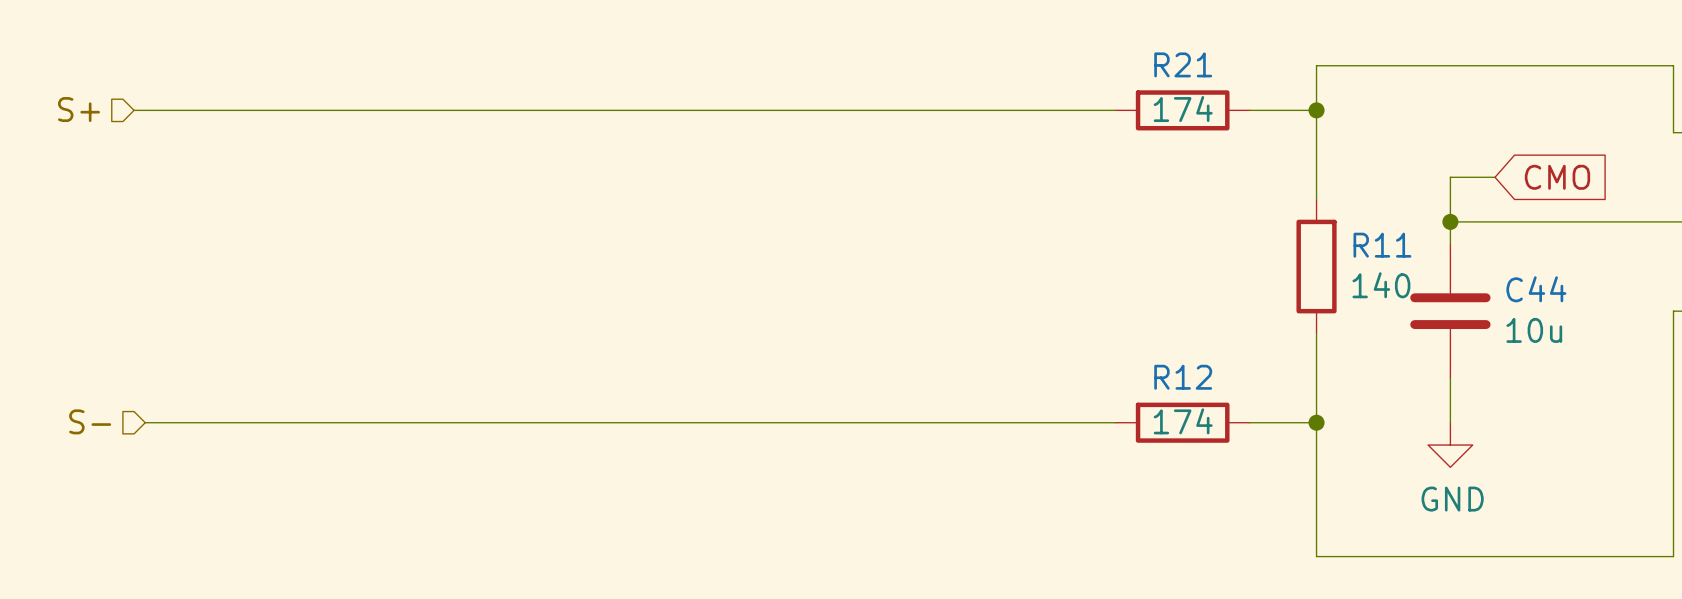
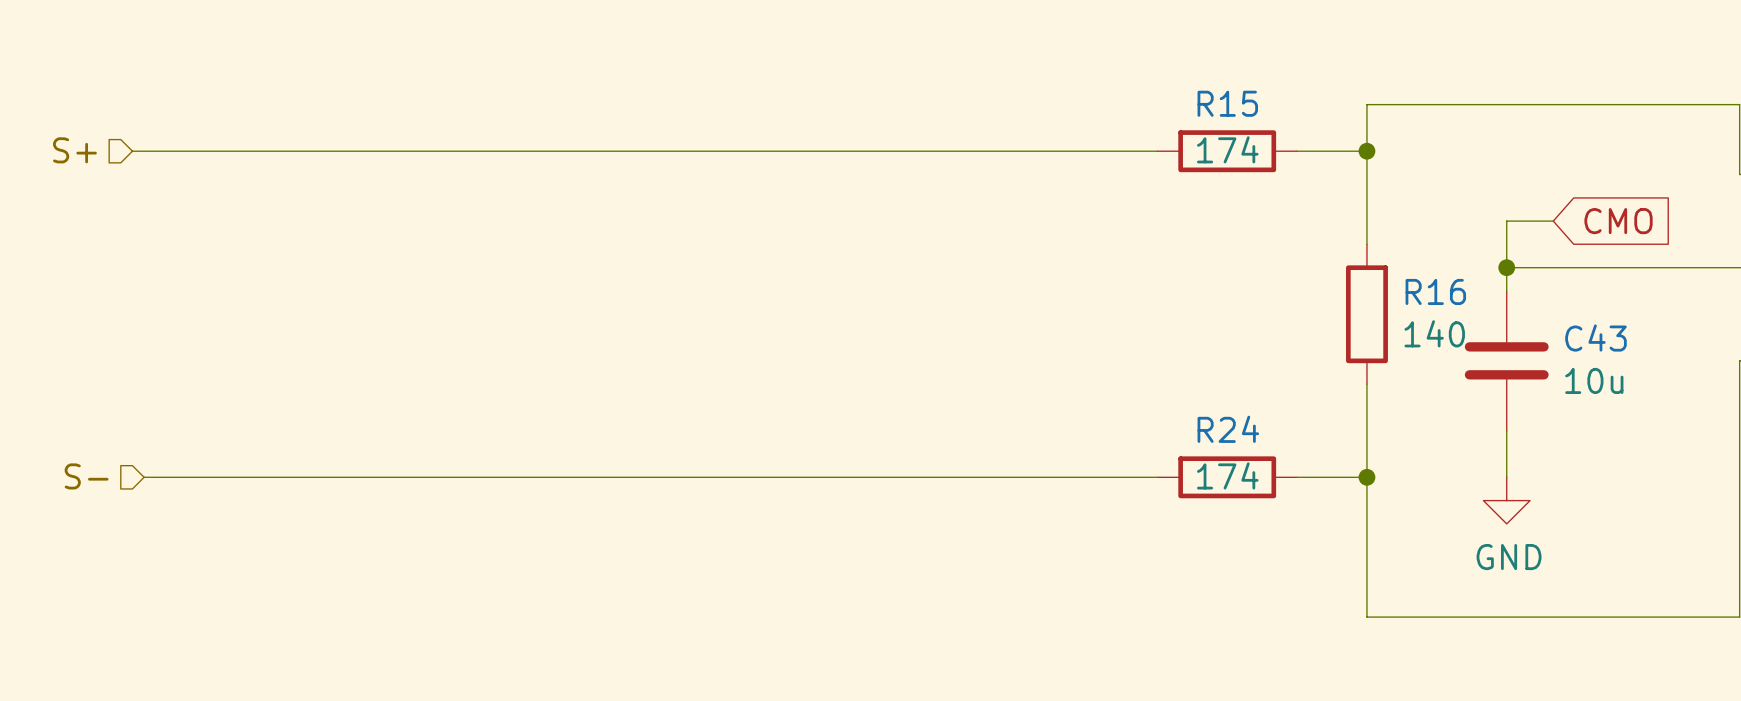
R21 name: R21 (1183, 64) -> R15 (1227, 103)
R11 name: R11 (1382, 245) -> R16 (1435, 291)
C44 name: C44 (1536, 289) -> C43 (1595, 338)
R12 name: R12 (1183, 377) -> R24 (1228, 429)

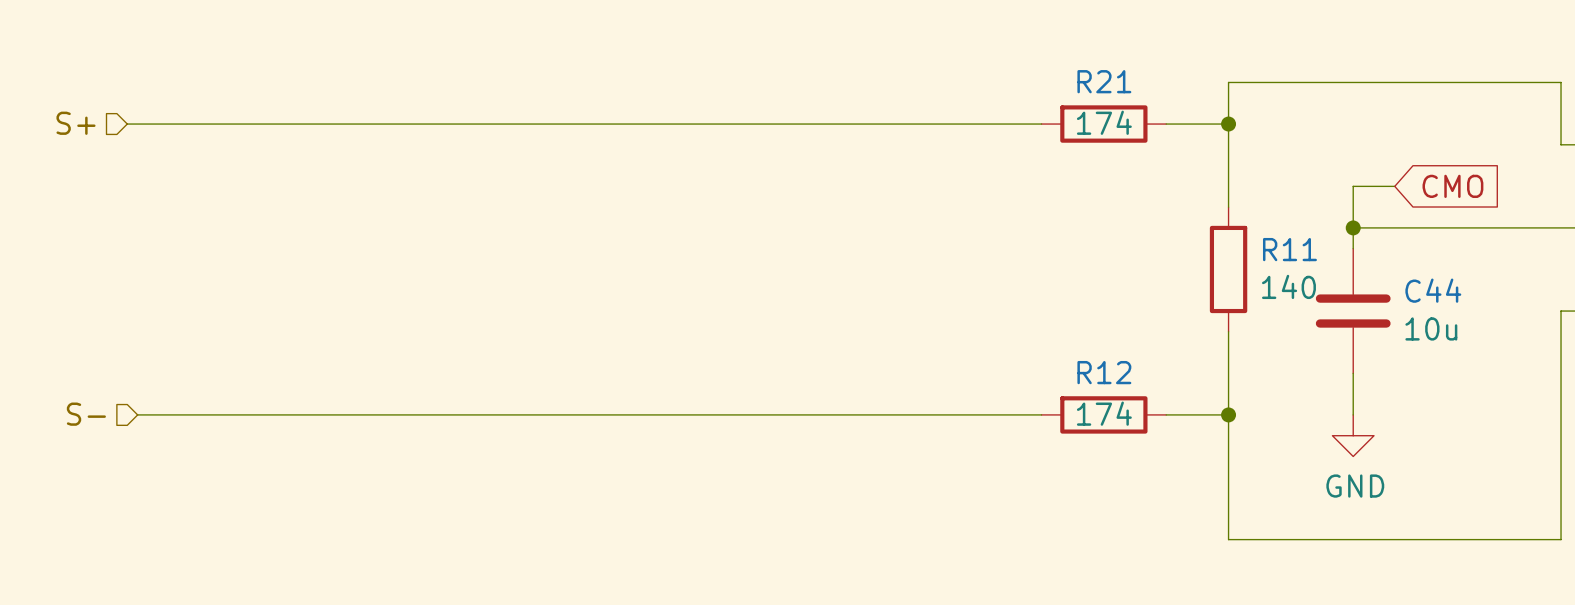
R15 name: R15 (1227, 103) -> R21 (1104, 81)
R16 name: R16 (1435, 291) -> R11 (1289, 249)
C43 name: C43 (1595, 338) -> C44 (1433, 290)
R24 name: R24 (1228, 429) -> R12 (1104, 372)

